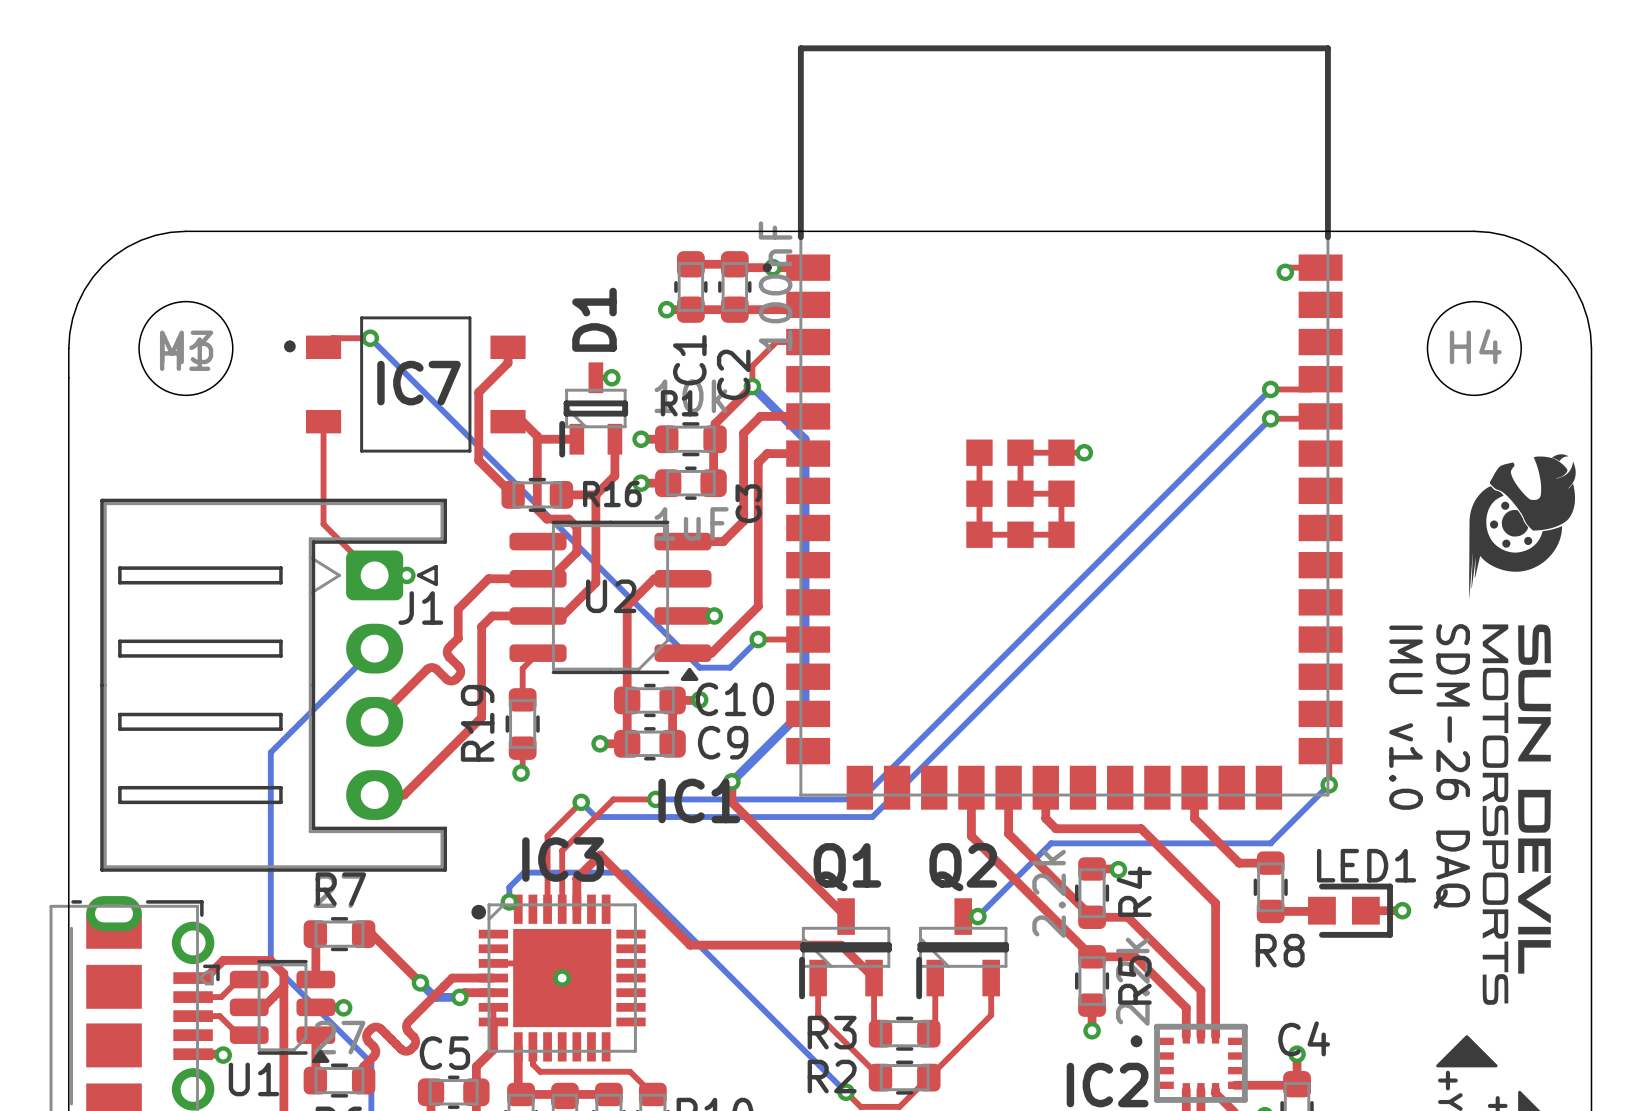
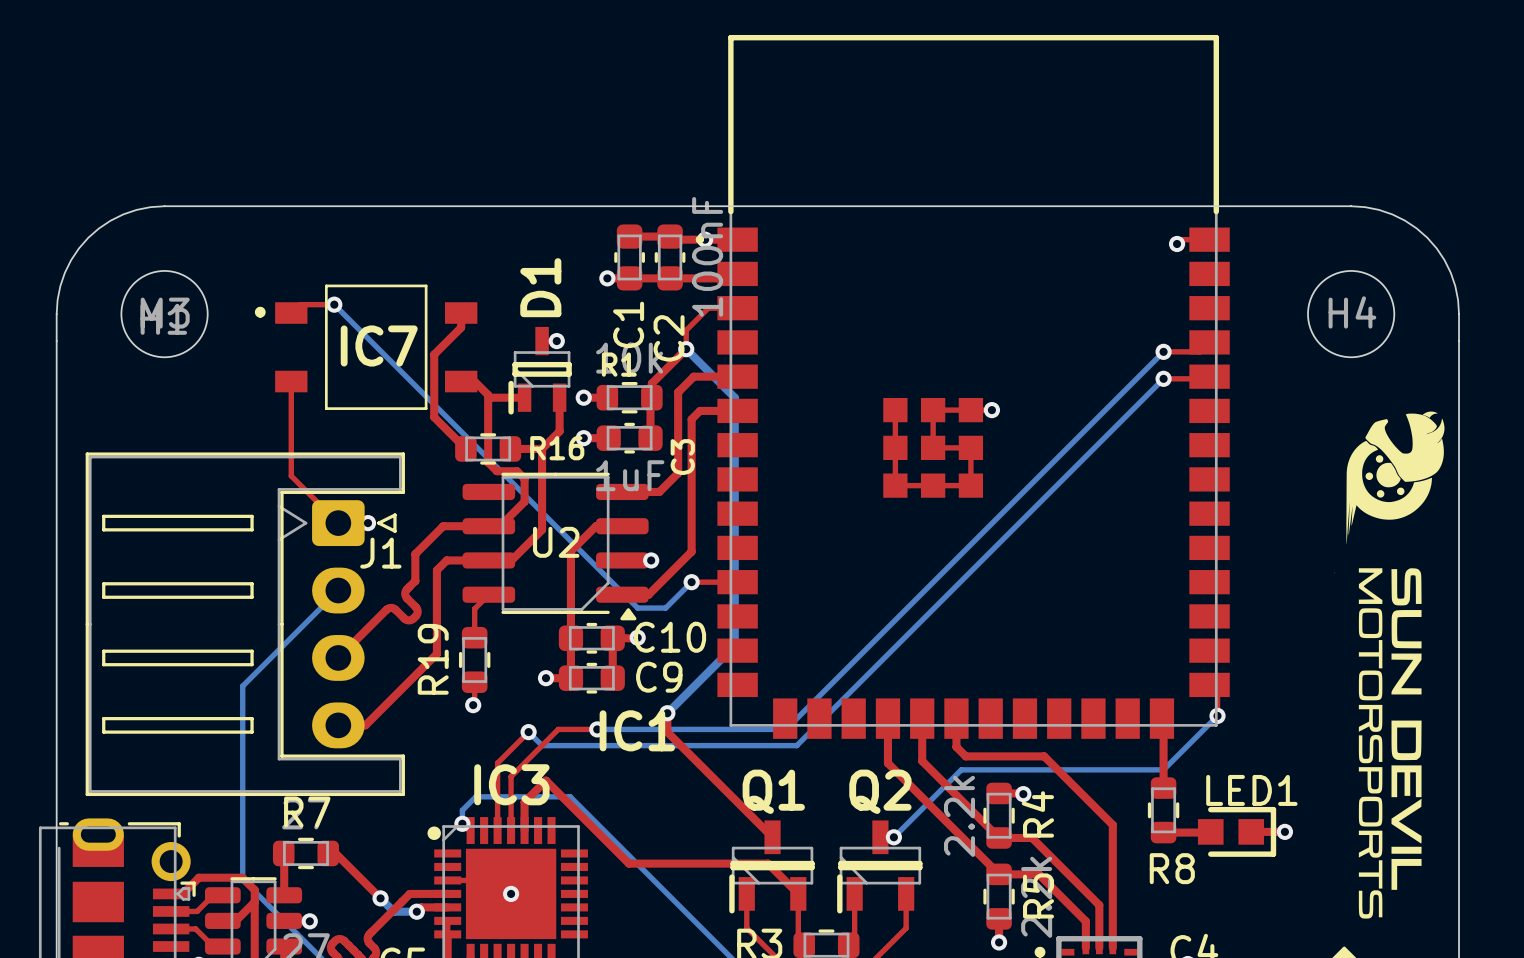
text: IMU v1.0 (1406, 717) -> none
text: SDM-26 DAQ (1451, 766) -> none
top track: (1194, 787) (1194, 818) (1239, 863) (1270, 863) -> (1163, 720) (1163, 788)

